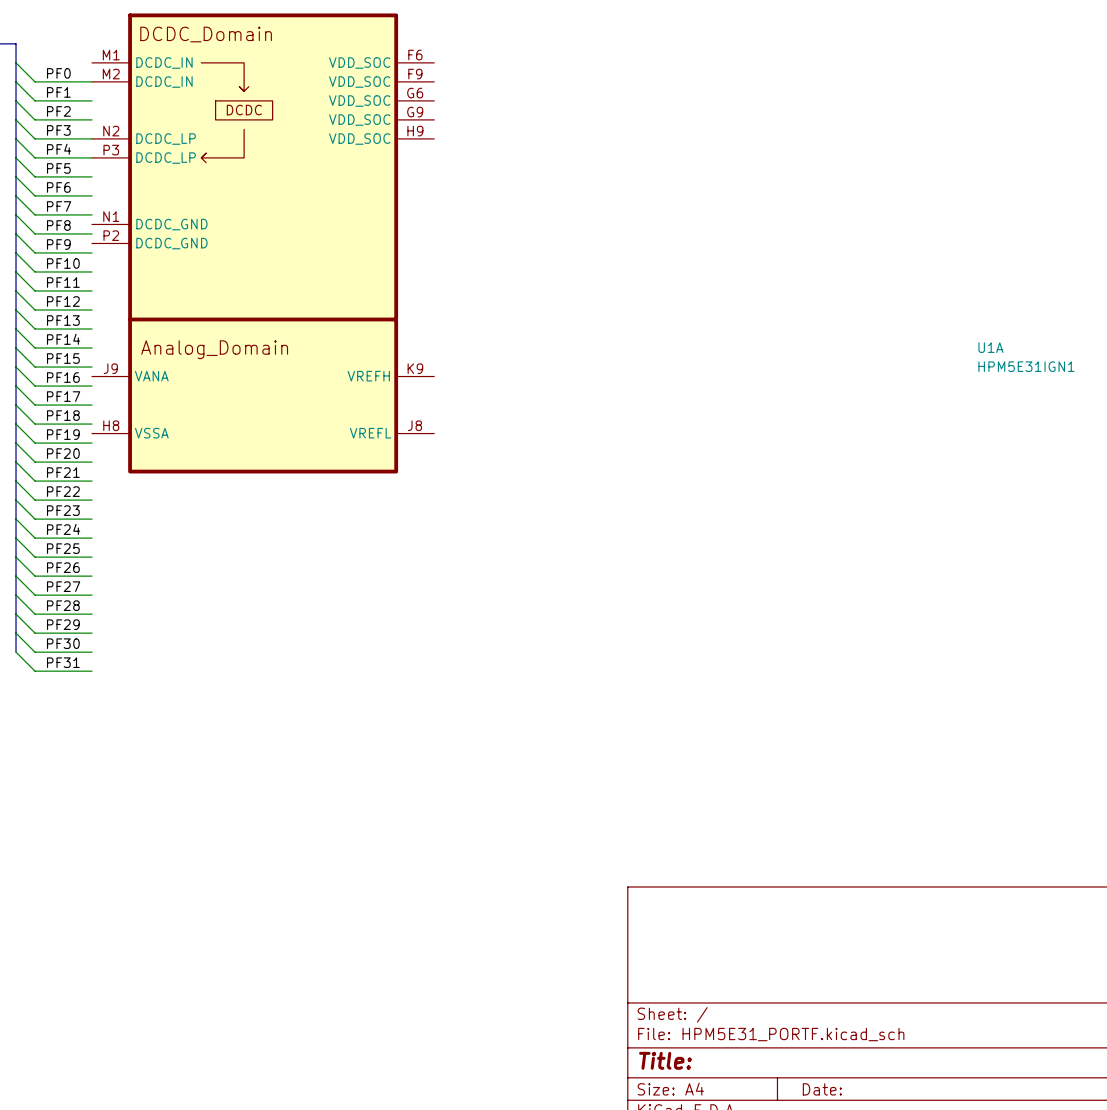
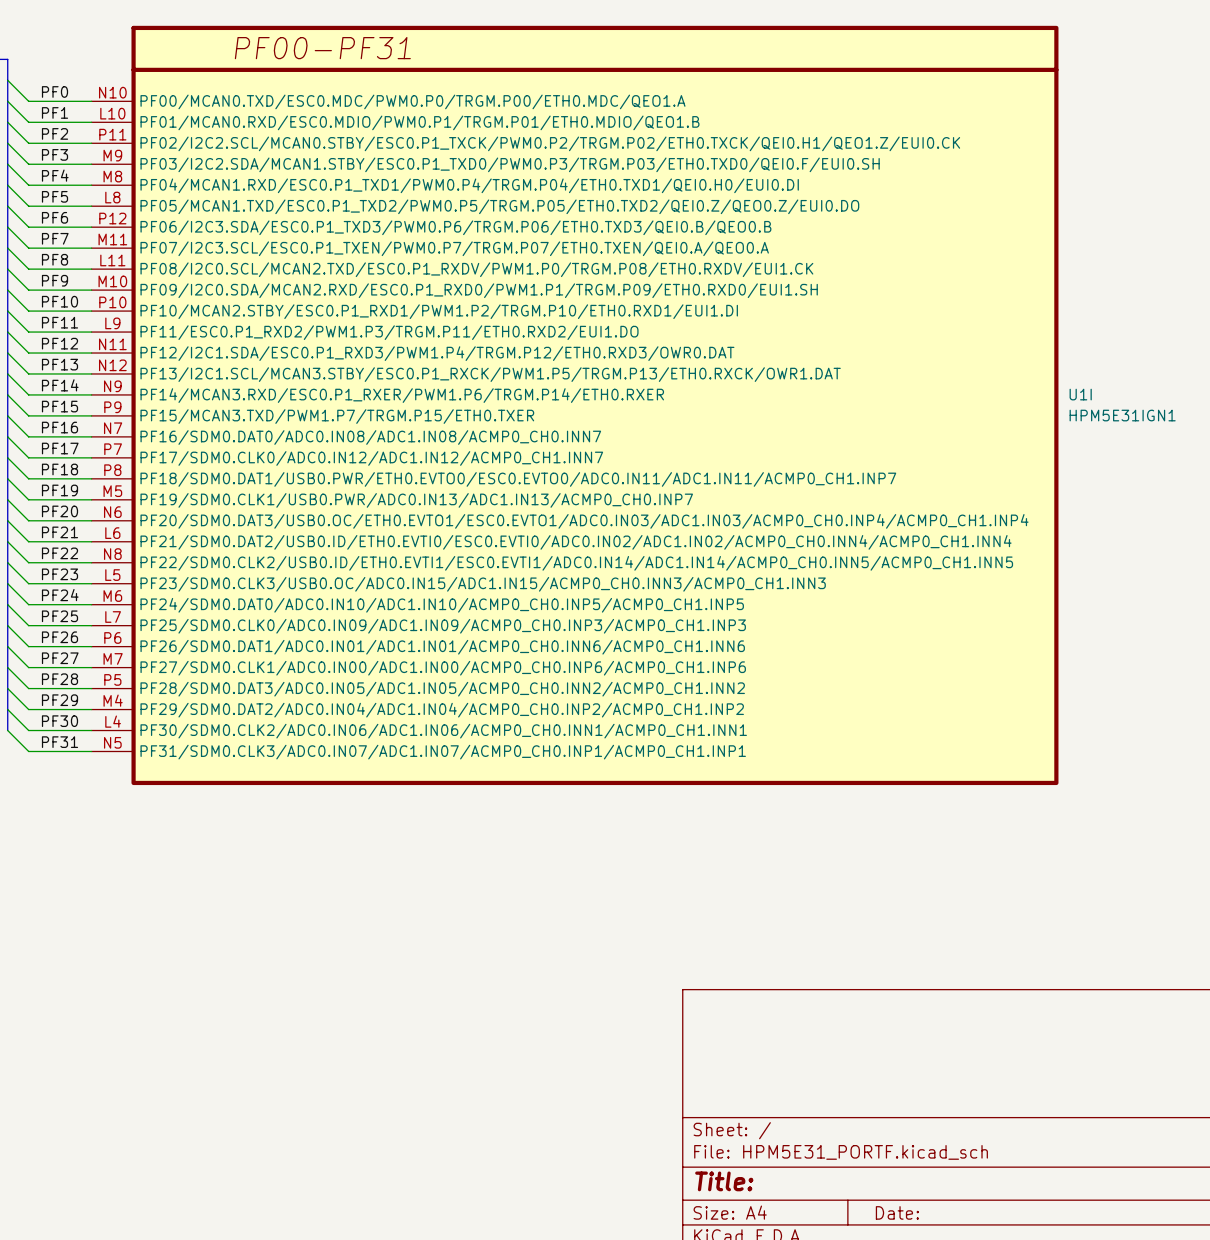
U1A: HPM5E31IGN1 (263, 243) -> none
U1I: none -> HPM5E31IGN1 (575, 405)

